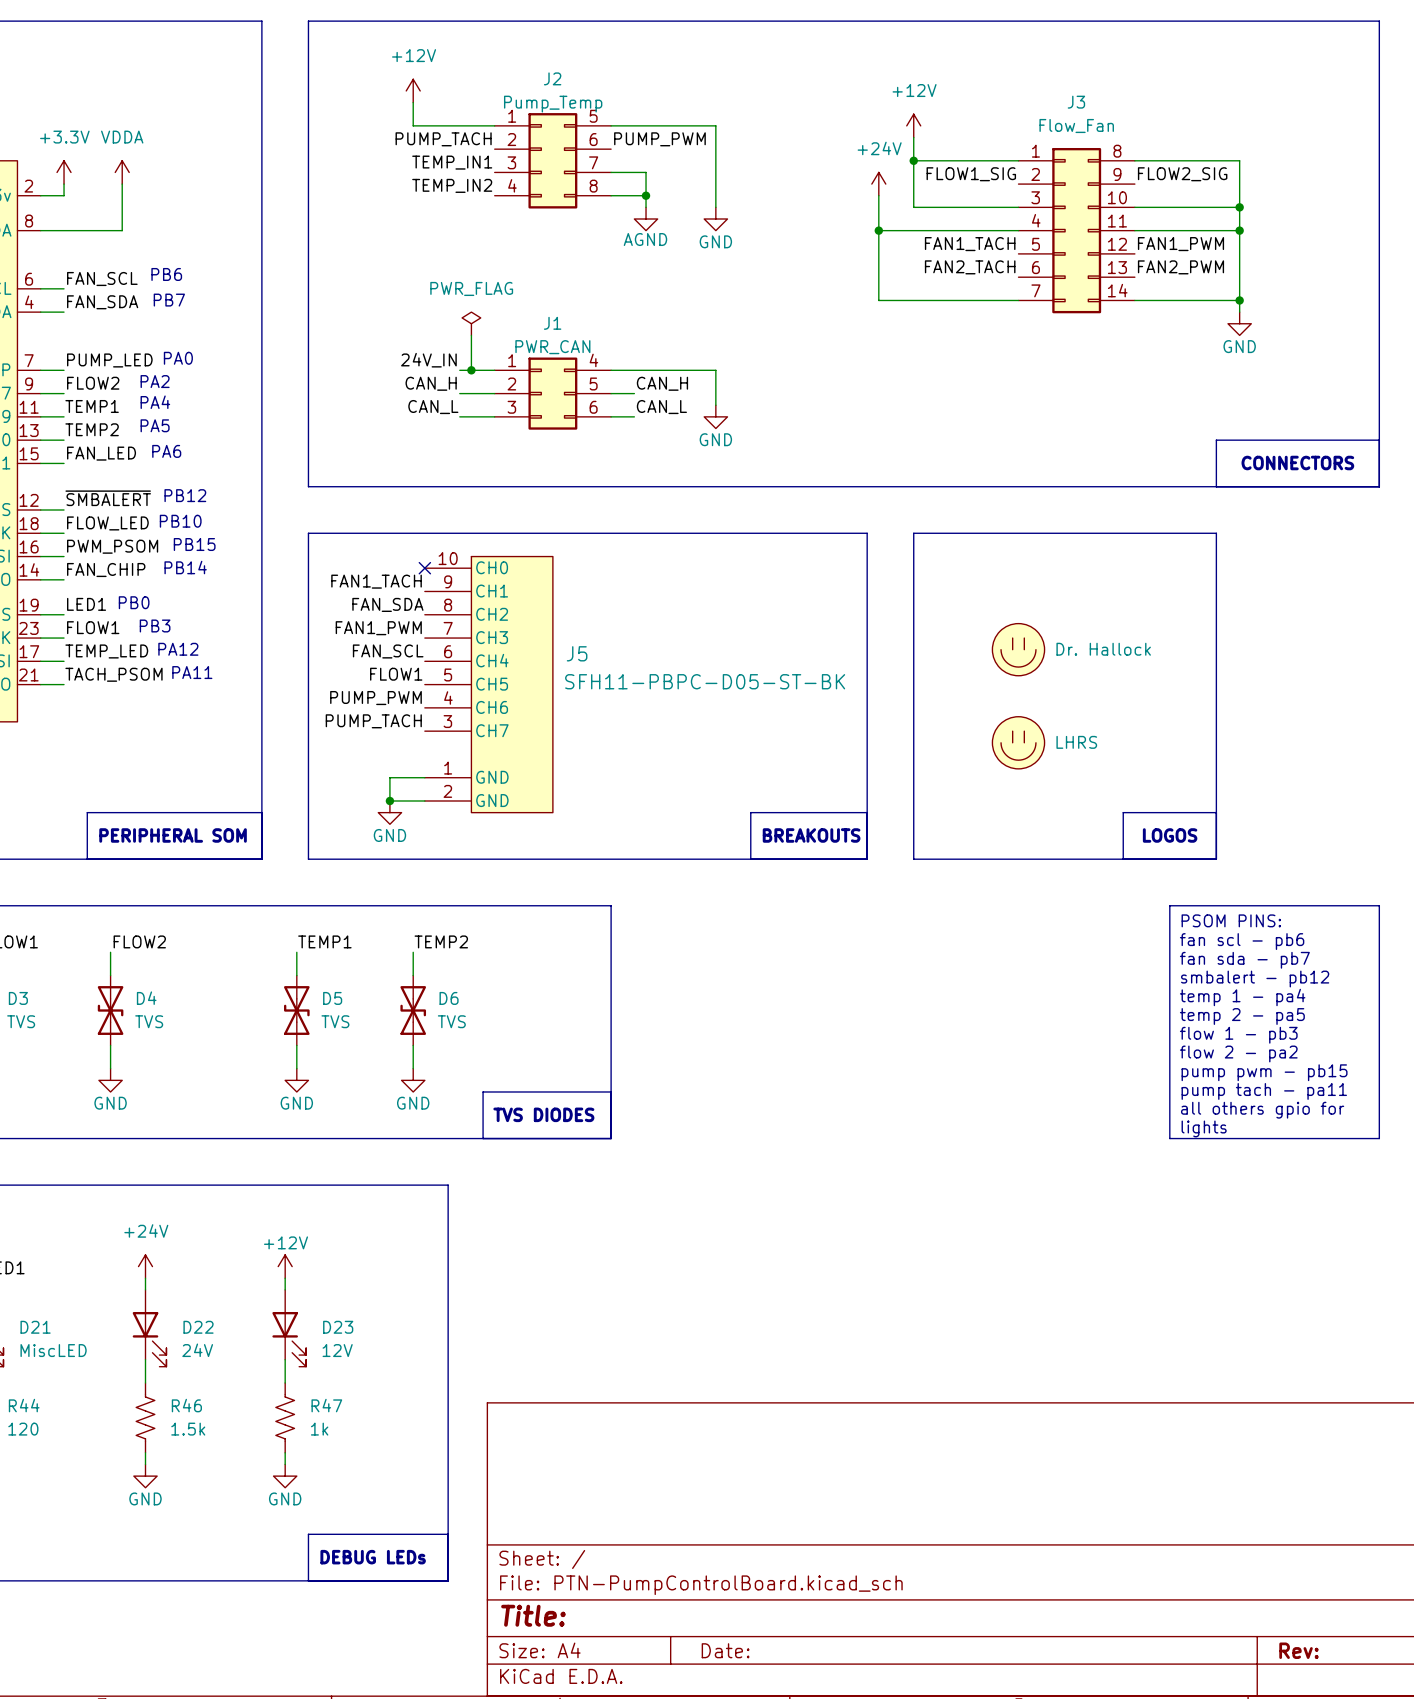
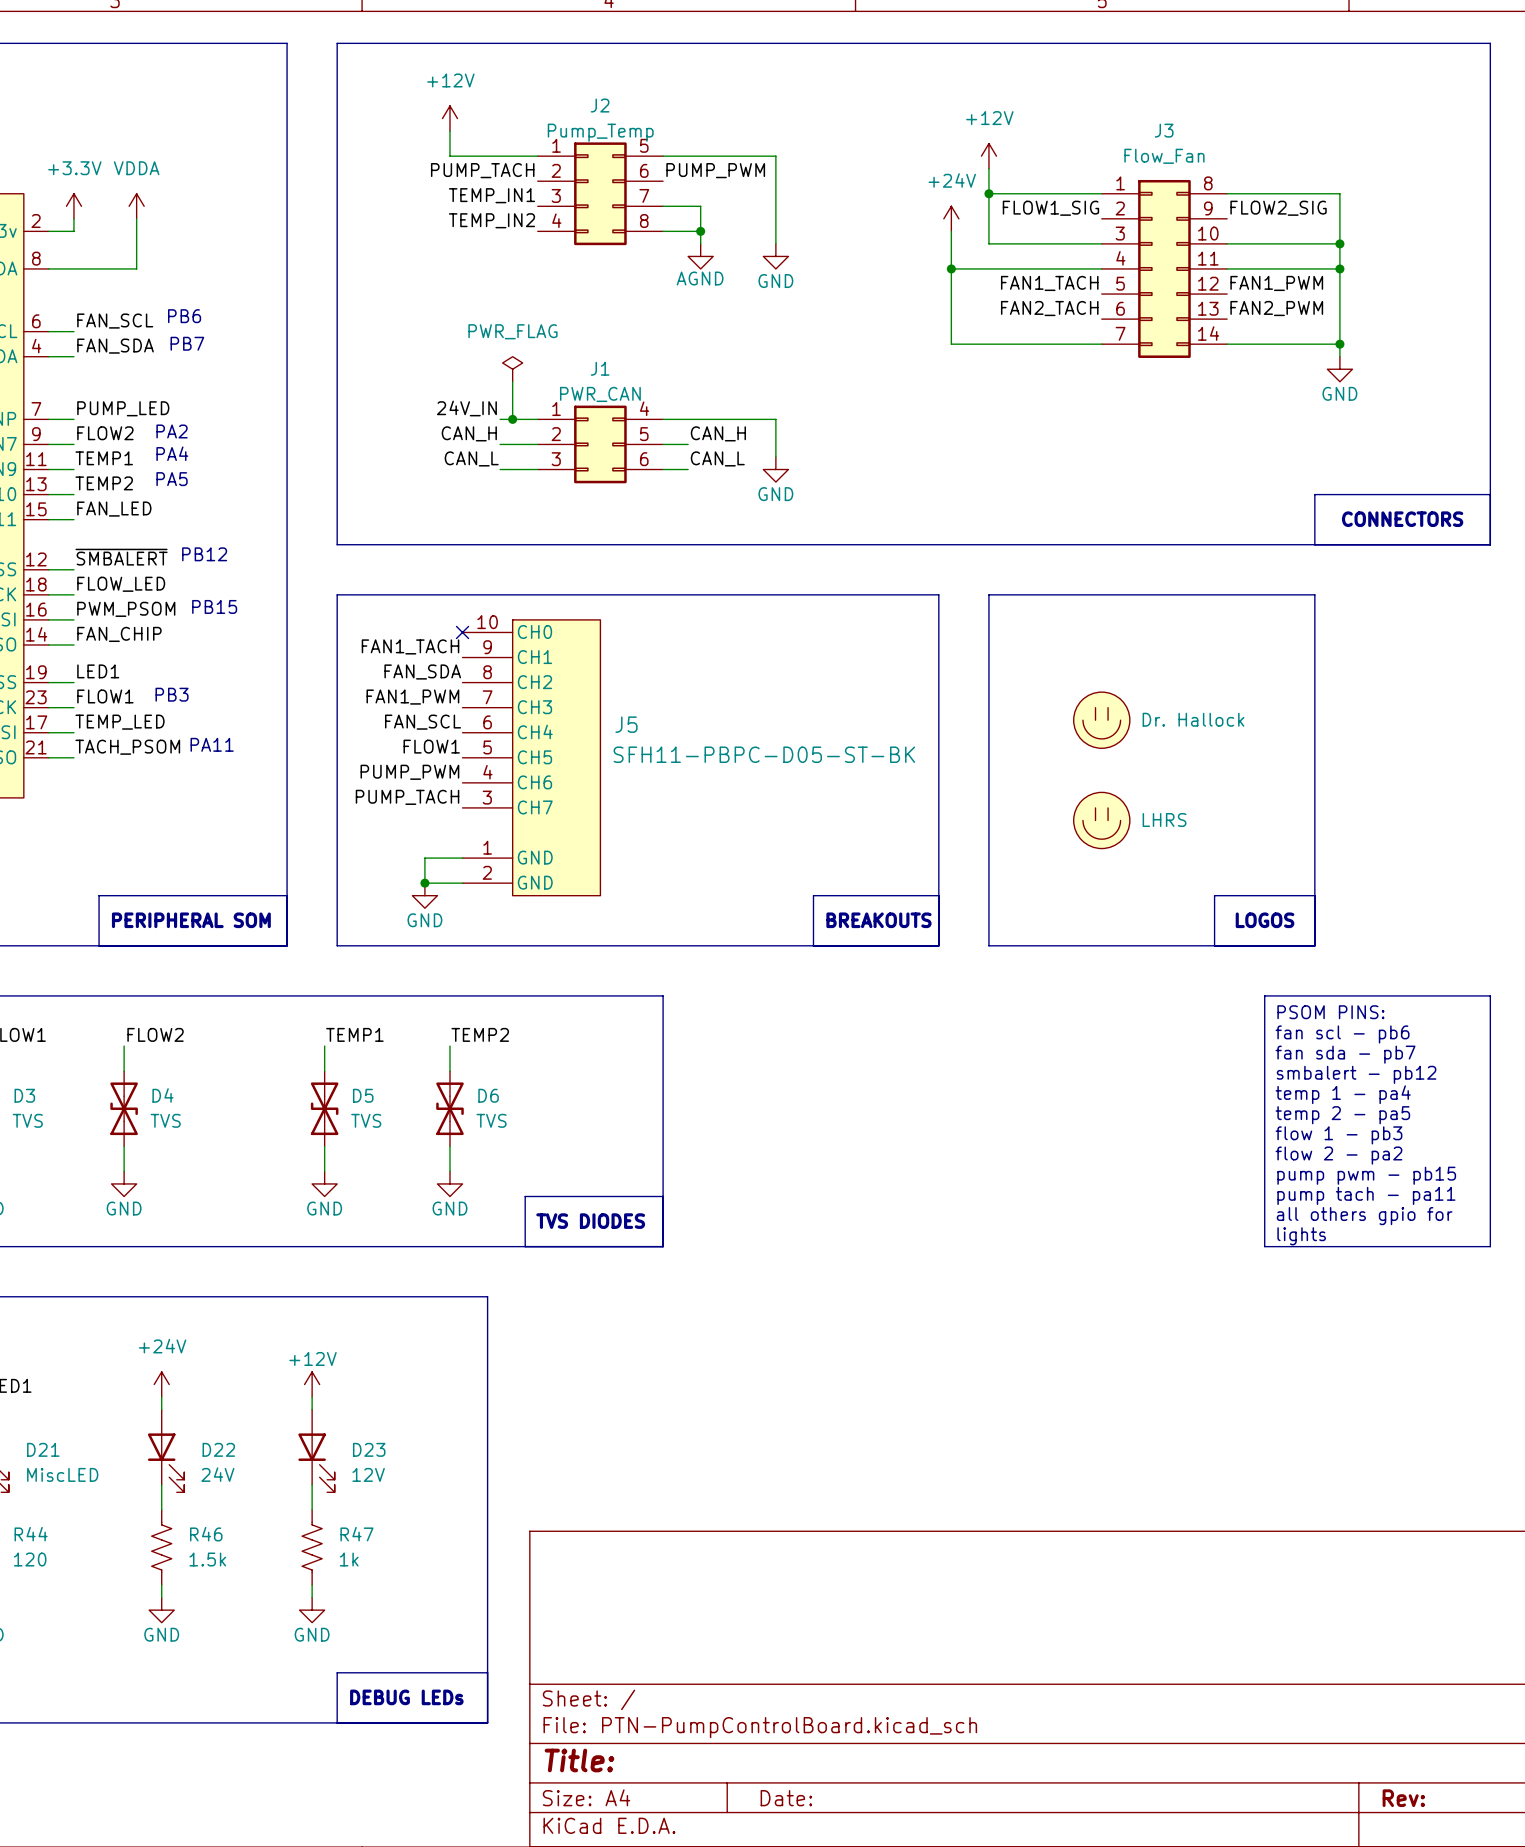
text: PA0 (178, 358) -> none
text: PA6 (166, 451) -> none
text: PB10 (180, 521) -> none
text: PB14 (185, 567) -> none
text: PB0 (134, 602) -> none
text: PA12 (178, 649) -> none

